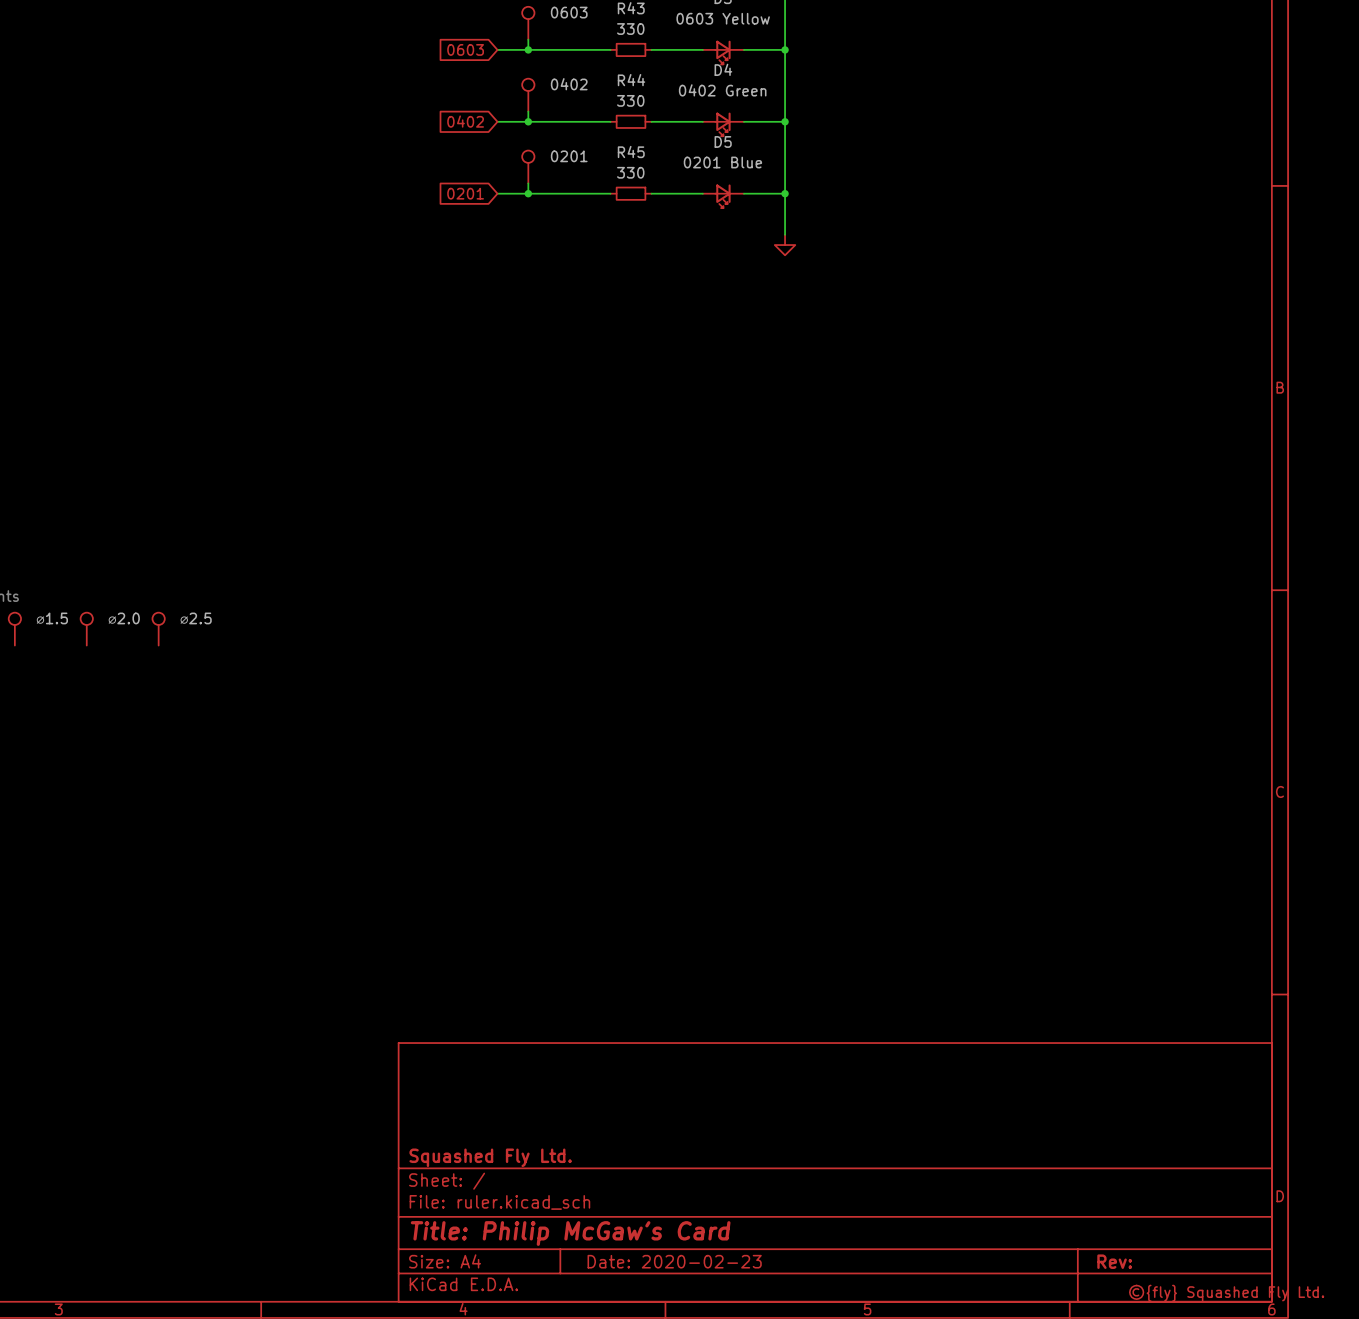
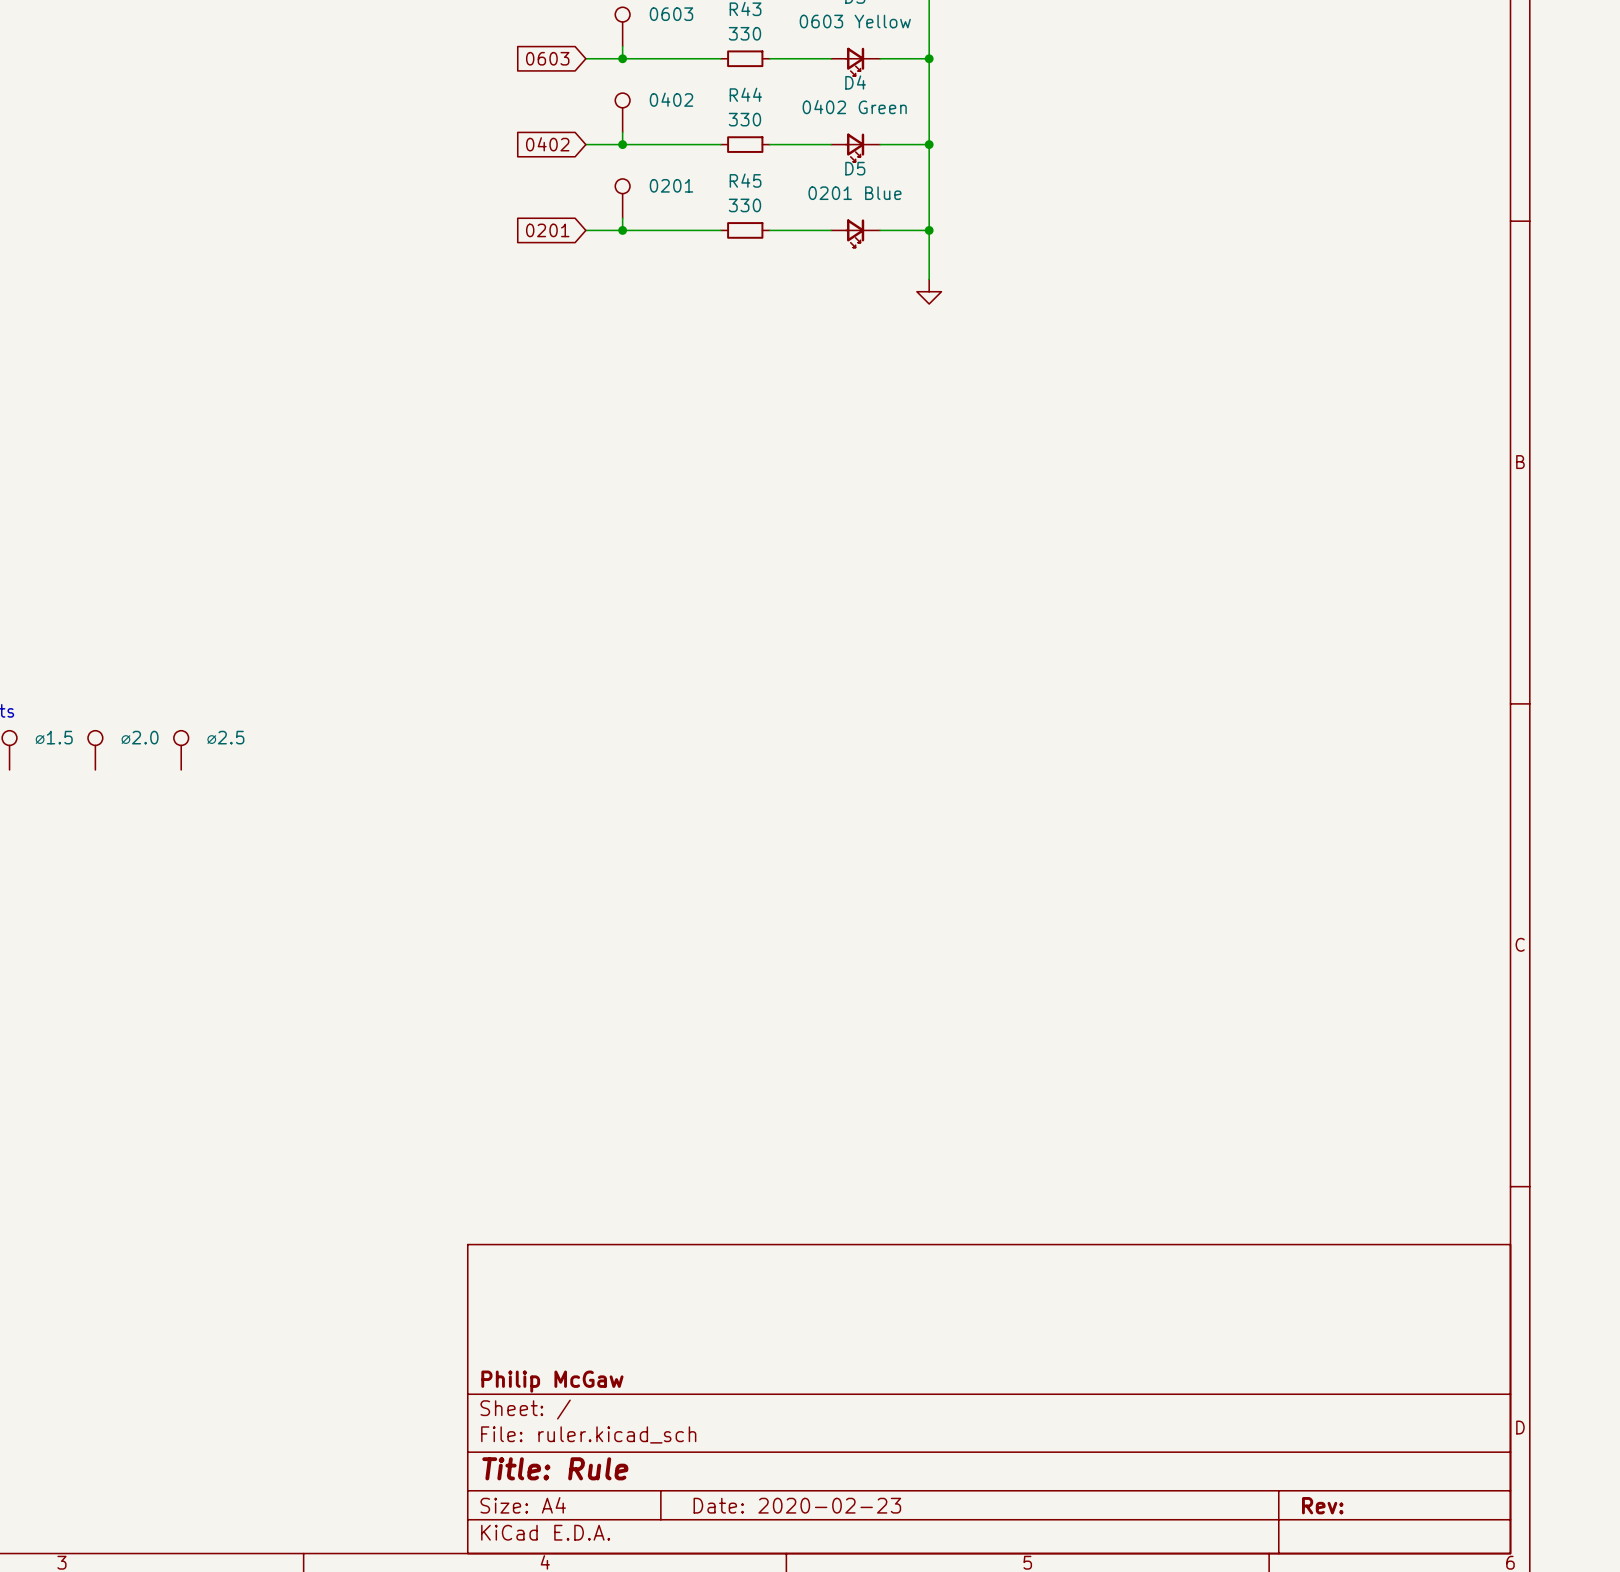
title block: Squashed Fly Ltd. (490, 1157) -> Philip McGaw (552, 1381)
title block: Title: Philip McGaw's Card (570, 1233) -> Title: Rule (555, 1468)
part: (1226, 1293) -> none

